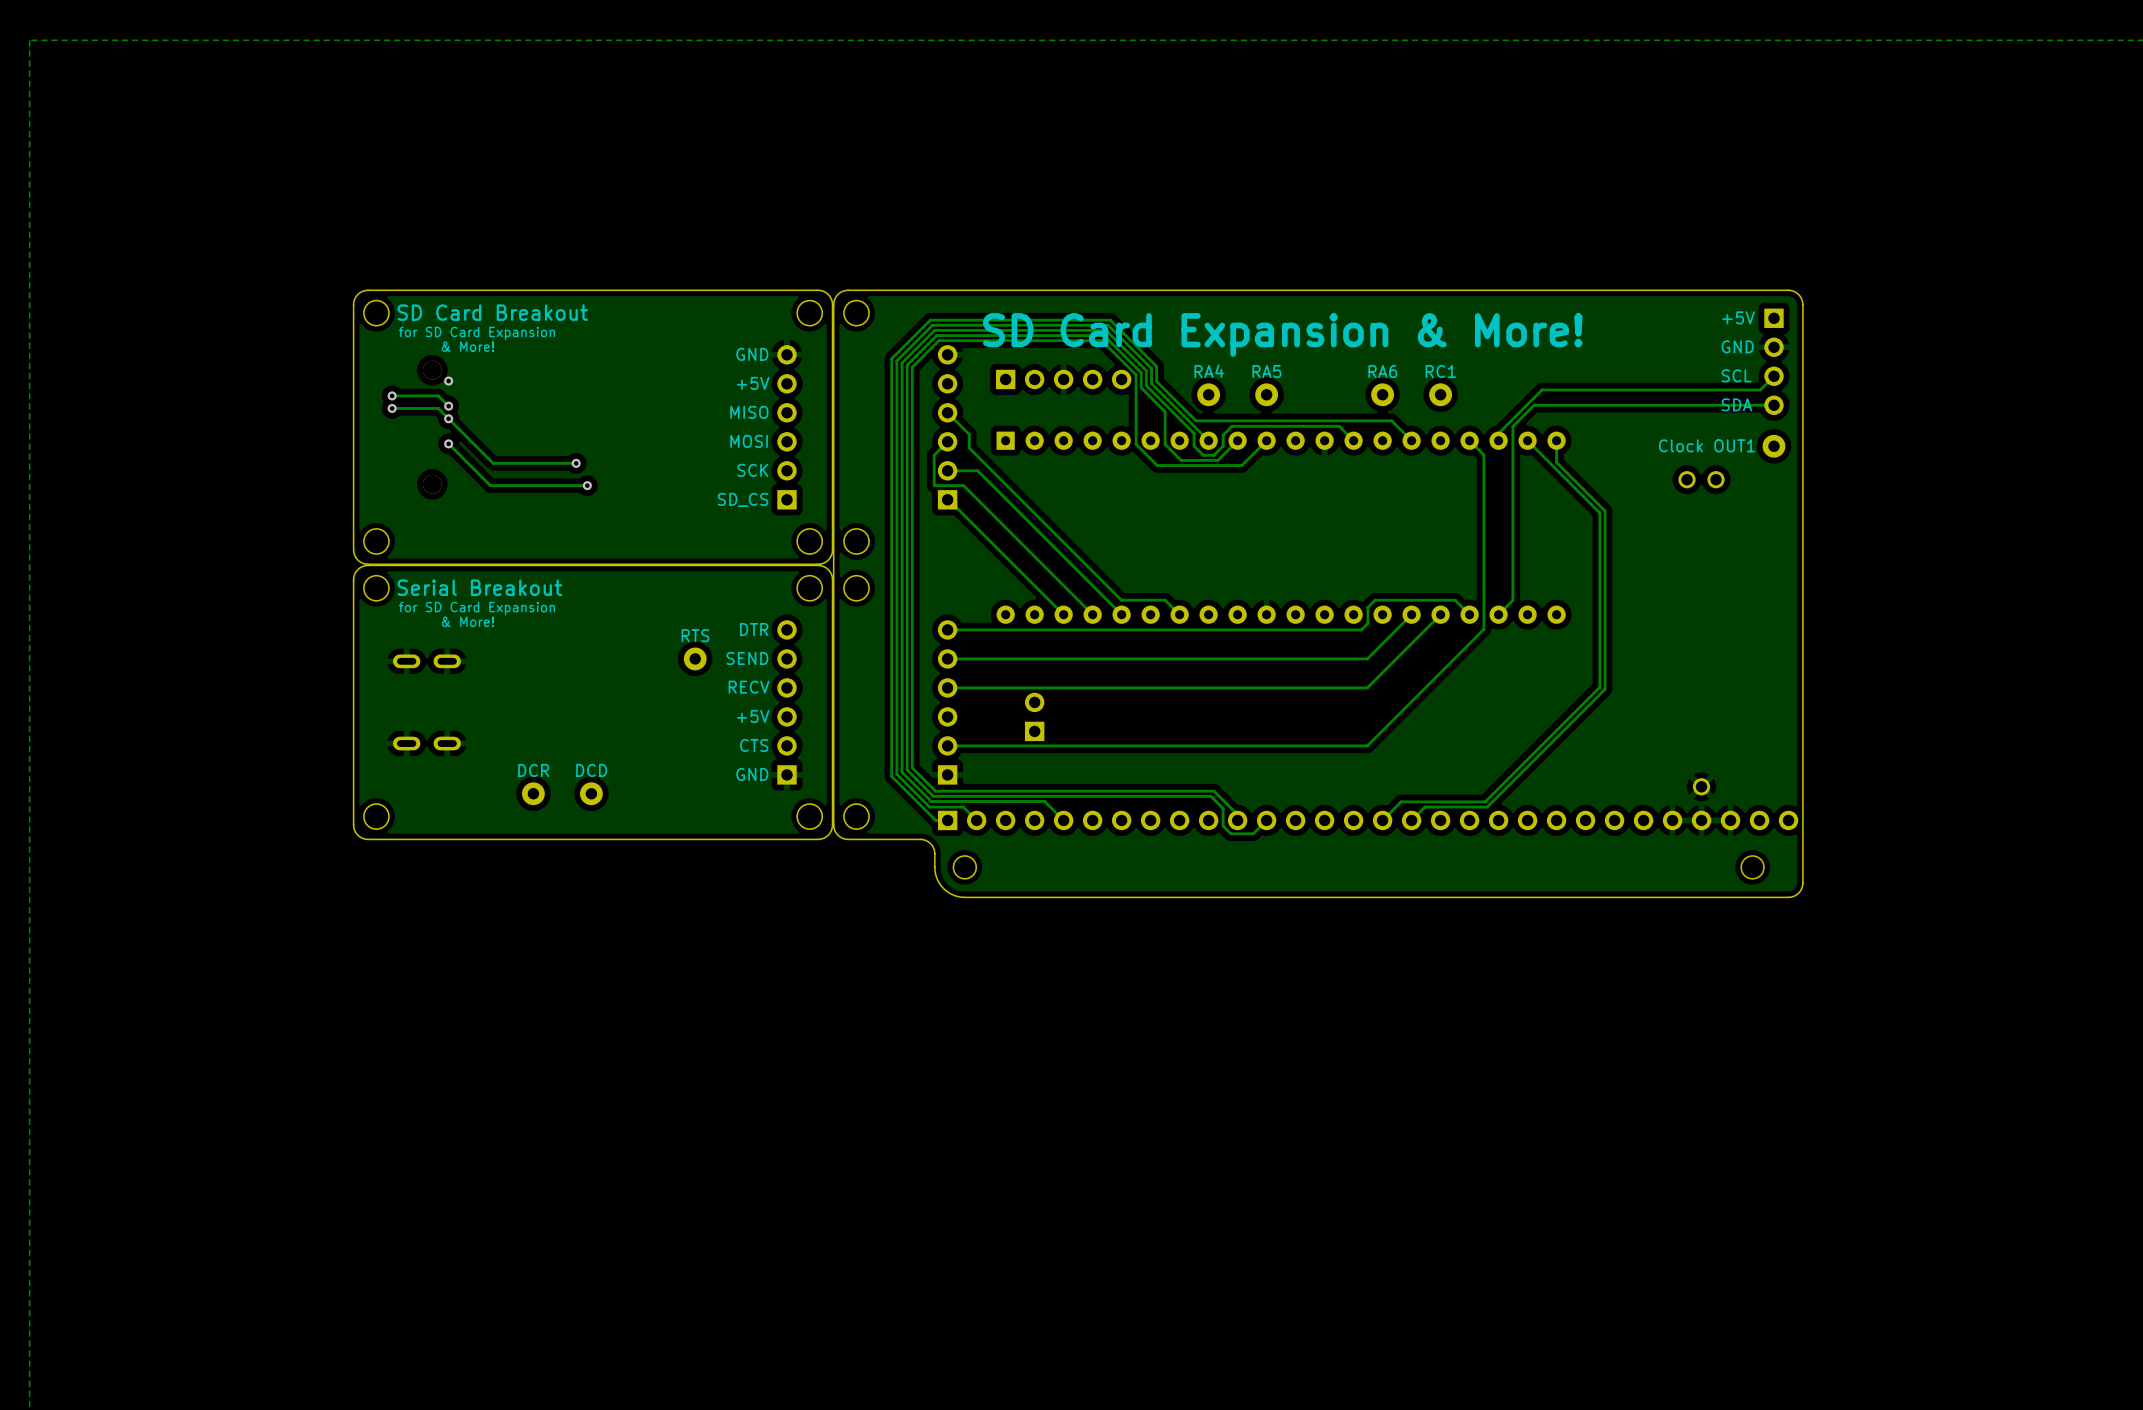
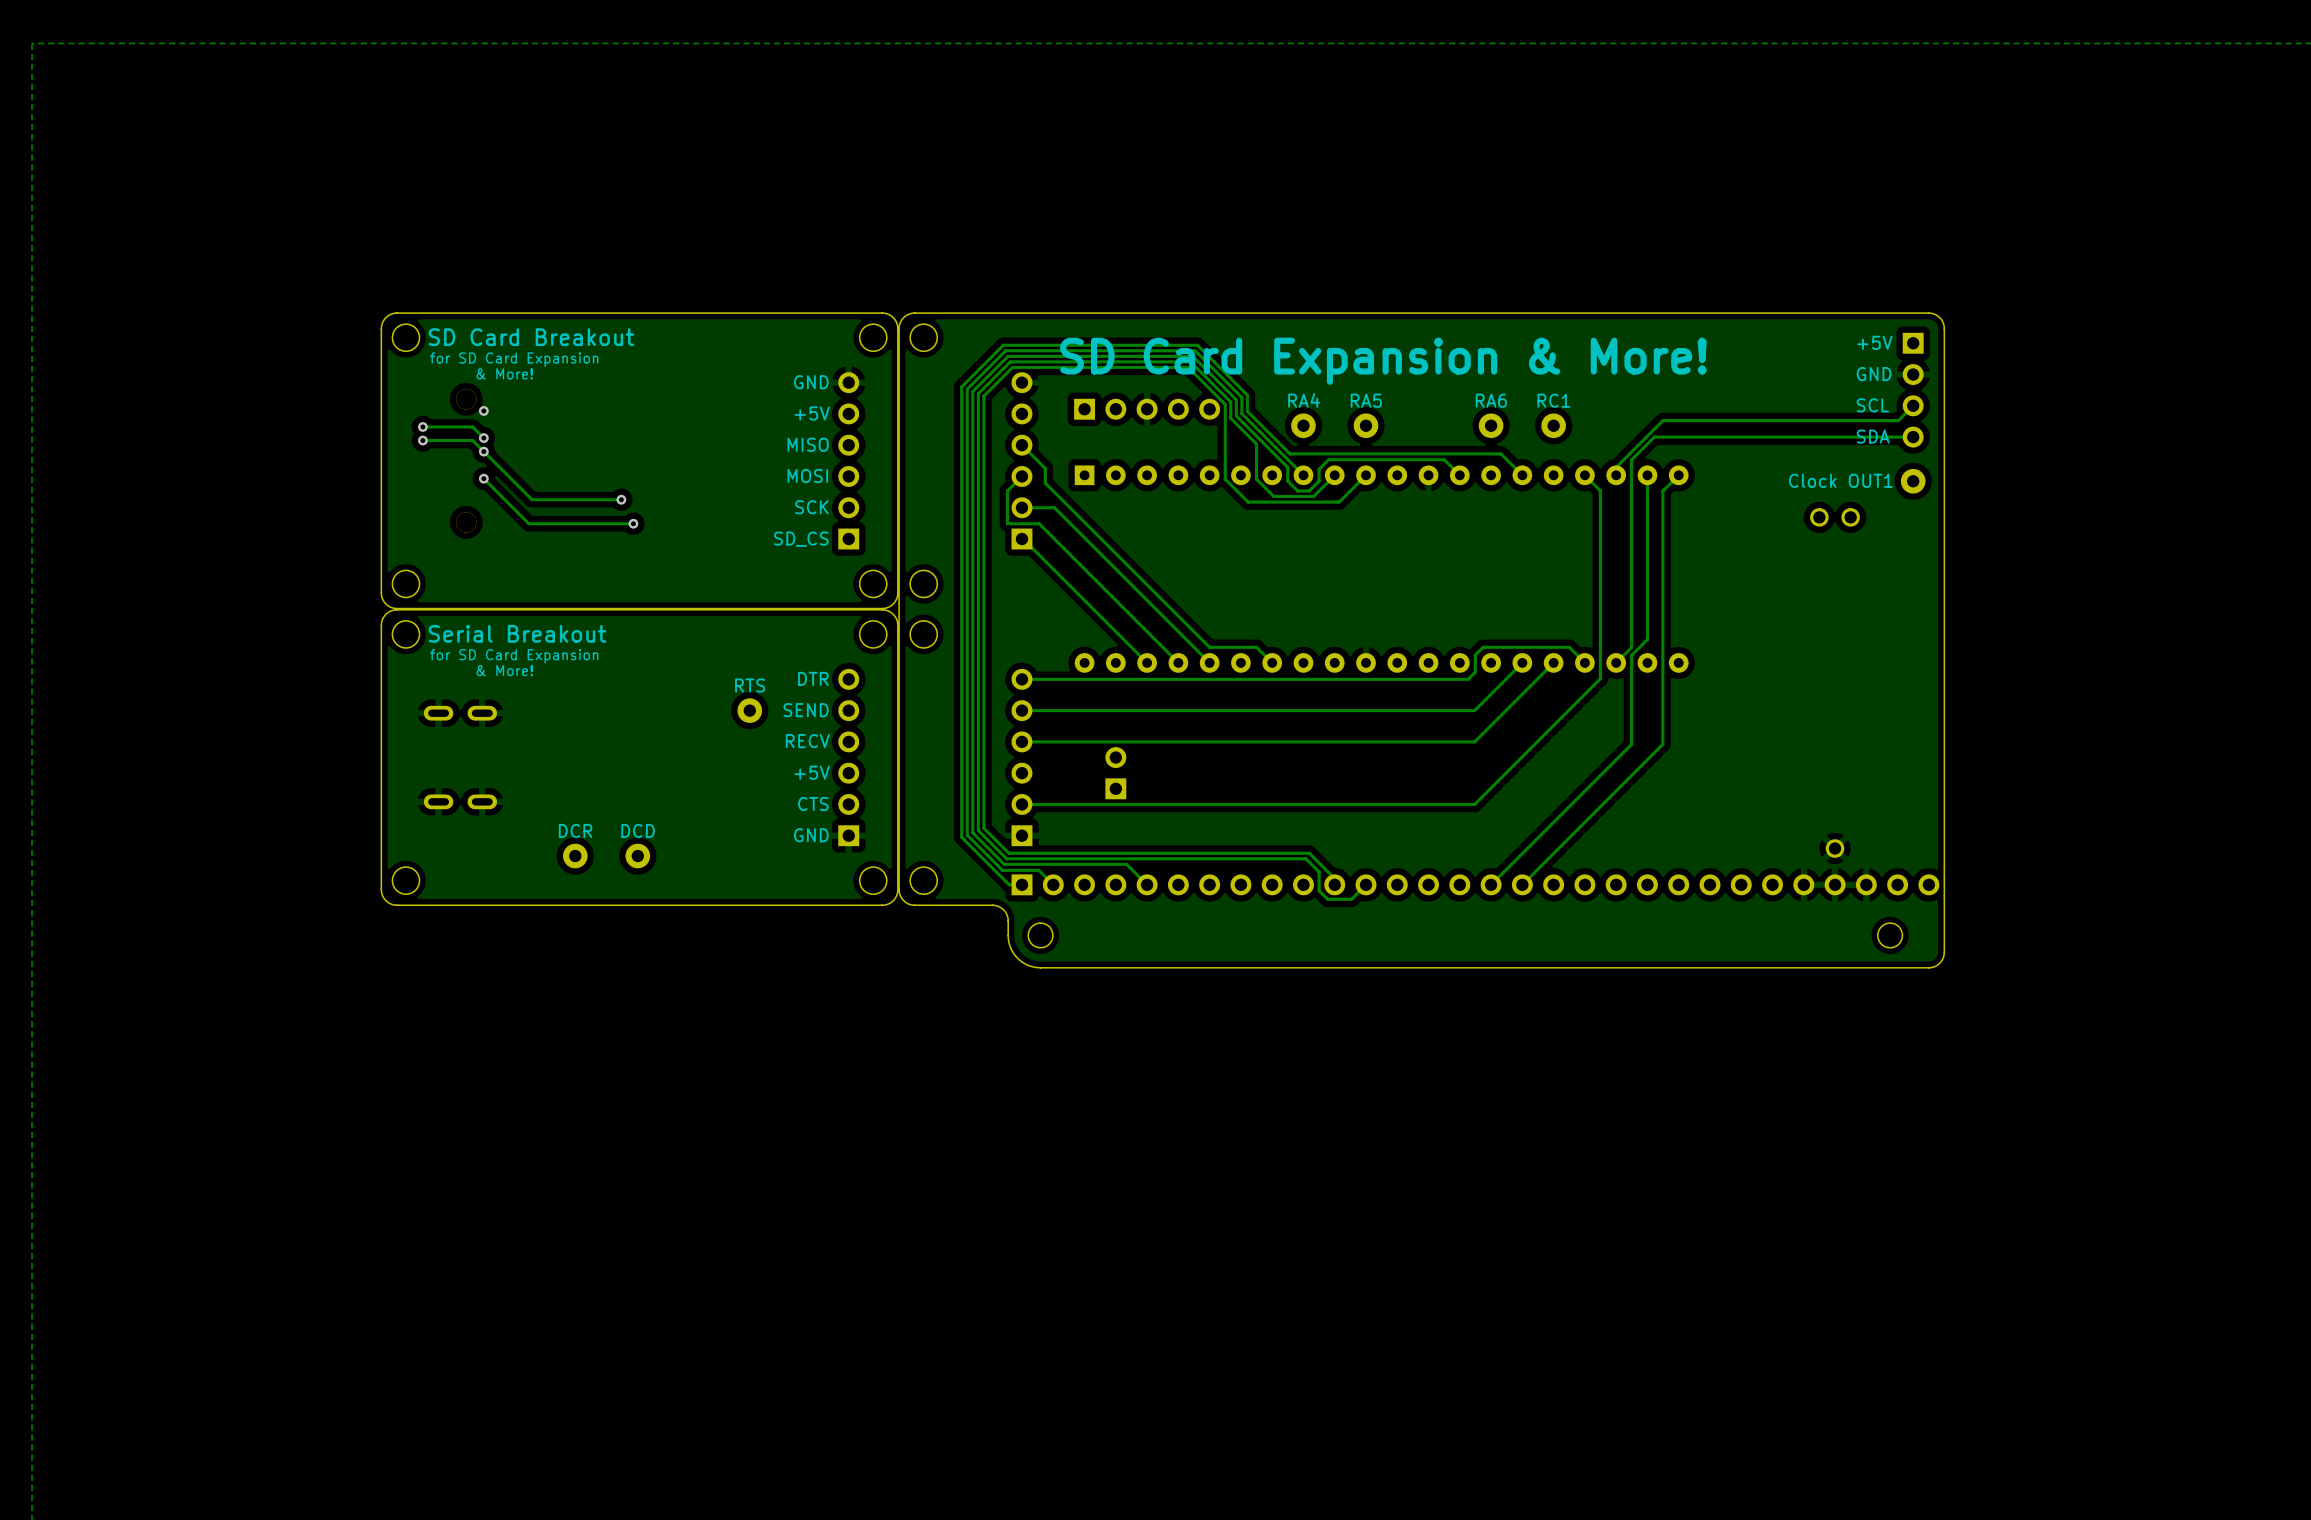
track: (1527, 440) (1599, 513) (1599, 687) (1485, 801) (1401, 801) -> (1647, 475) (1647, 639) (1631, 655) (1631, 744) (1511, 864)
track: (1556, 440) (1556, 462) (1605, 510) (1605, 689) (1487, 807) (1425, 807) -> (1678, 475) (1662, 491) (1662, 744) (1536, 870)

